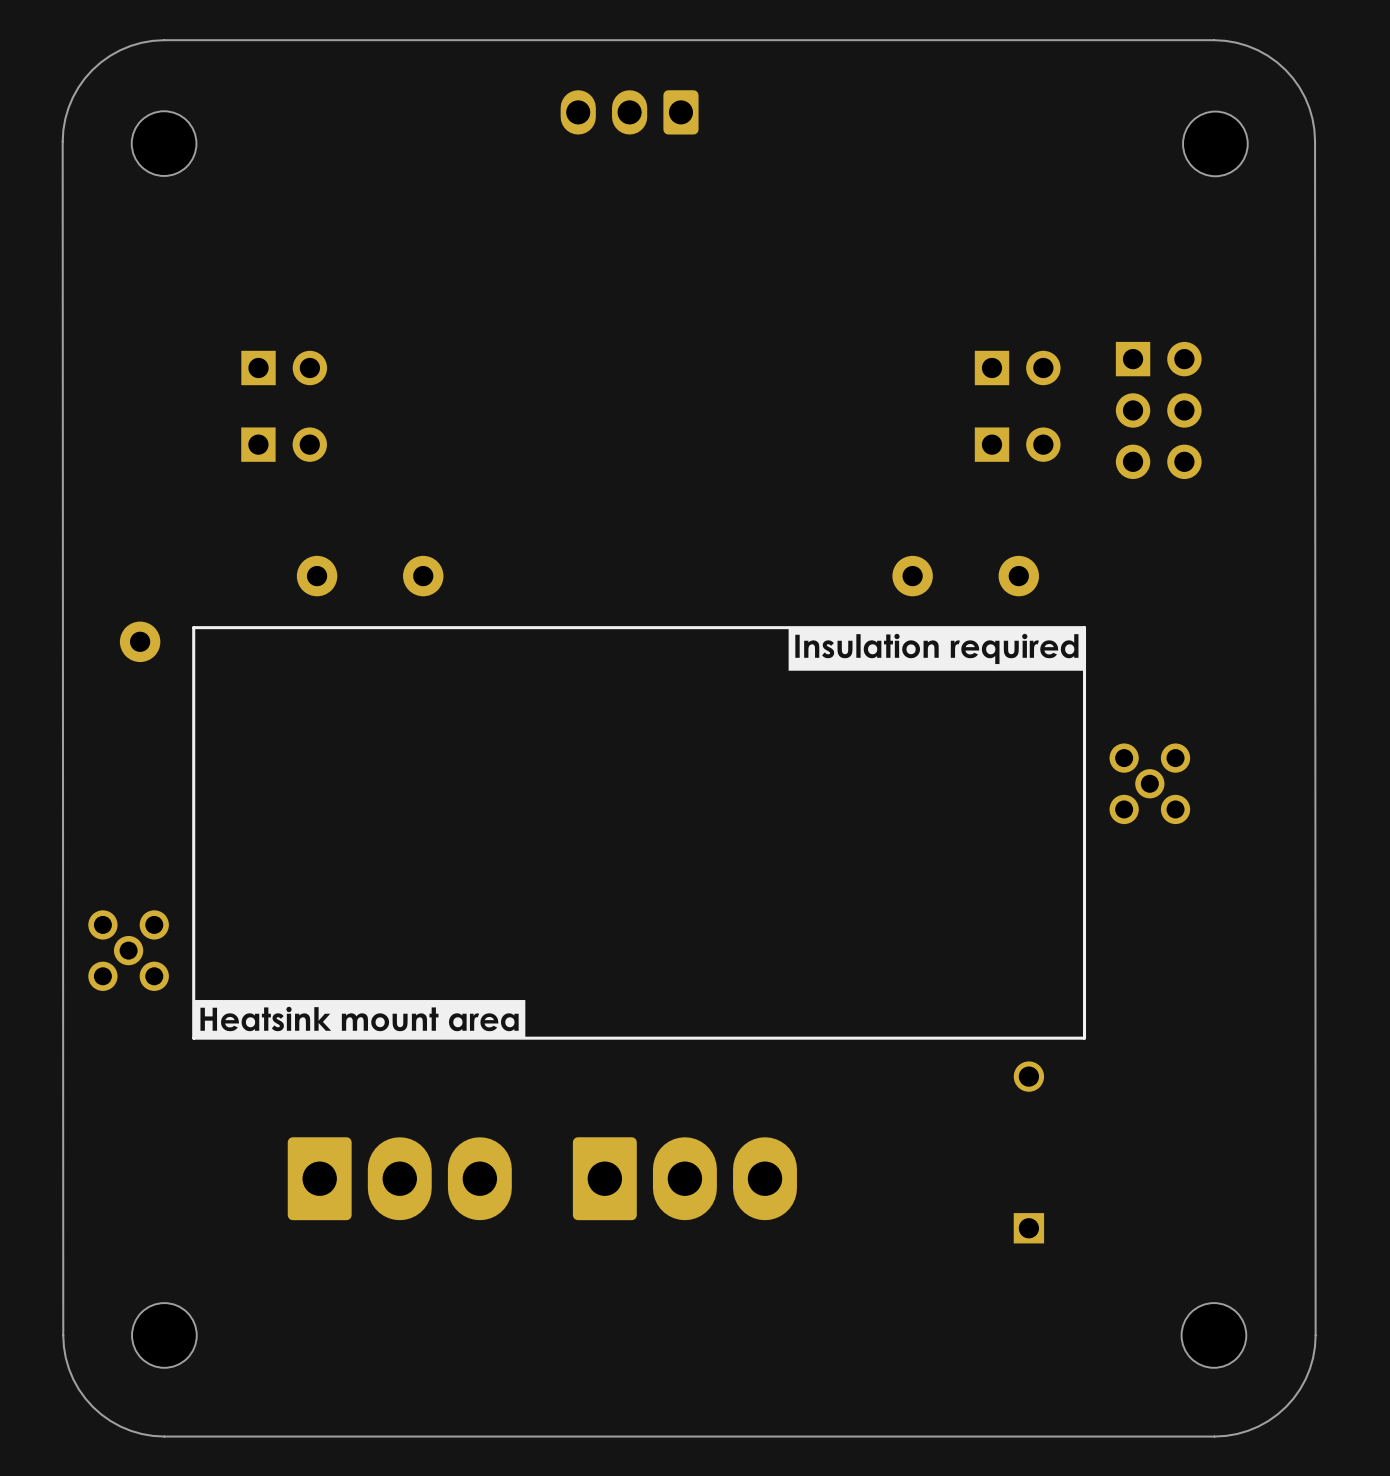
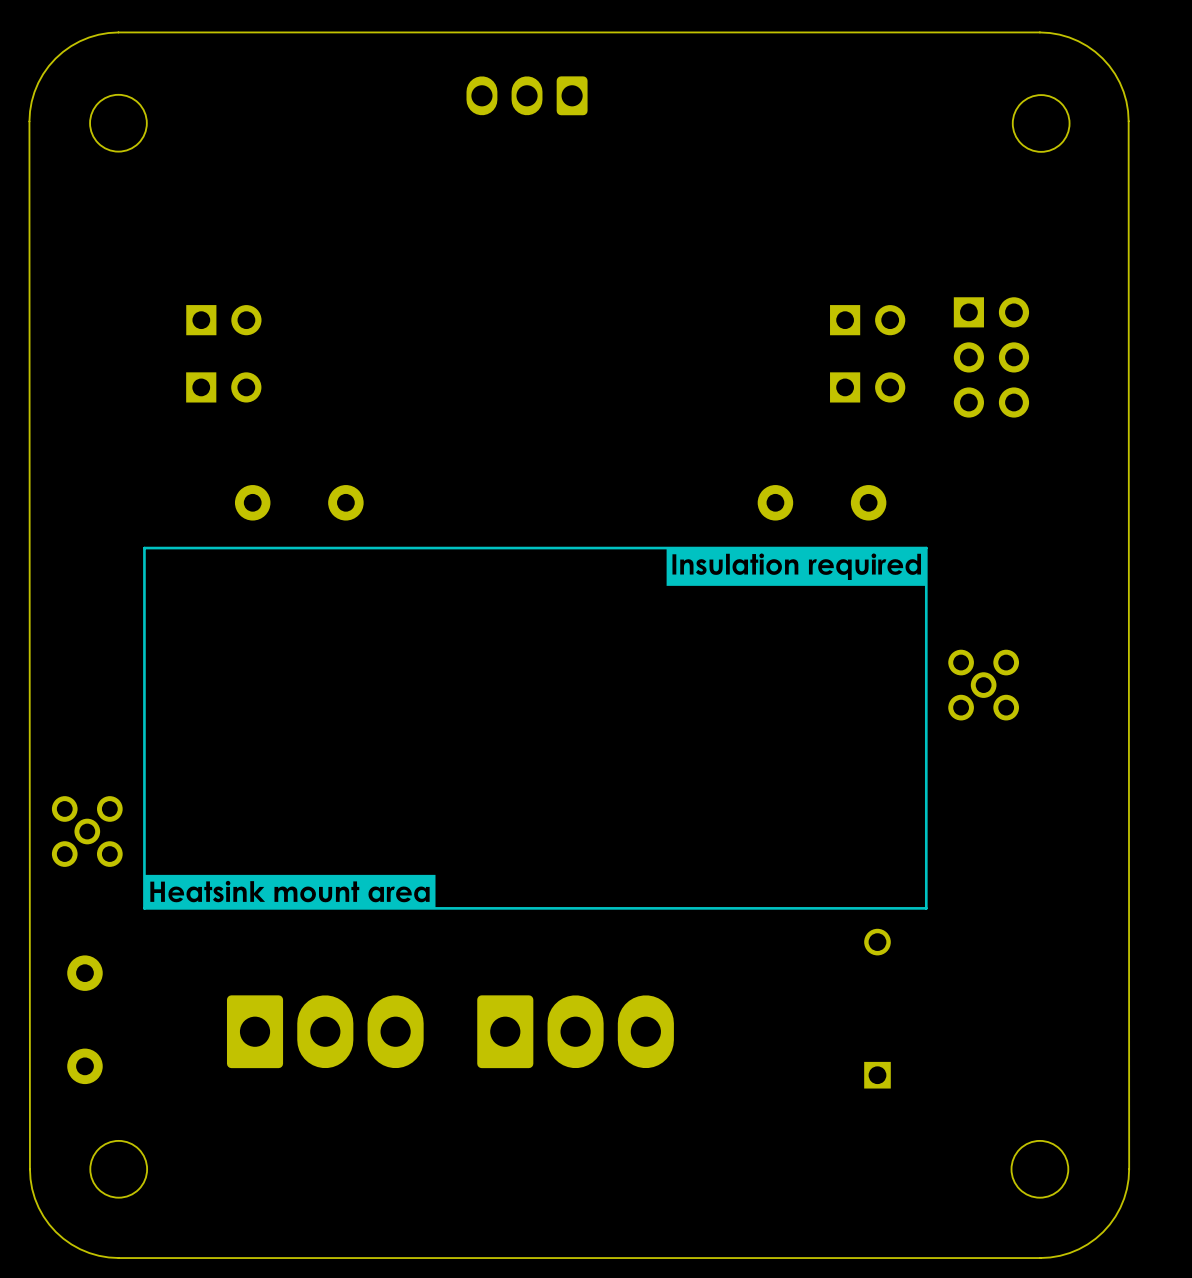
part: (140, 641) -> none
part: none -> (84, 973)
part: none -> (84, 1066)

